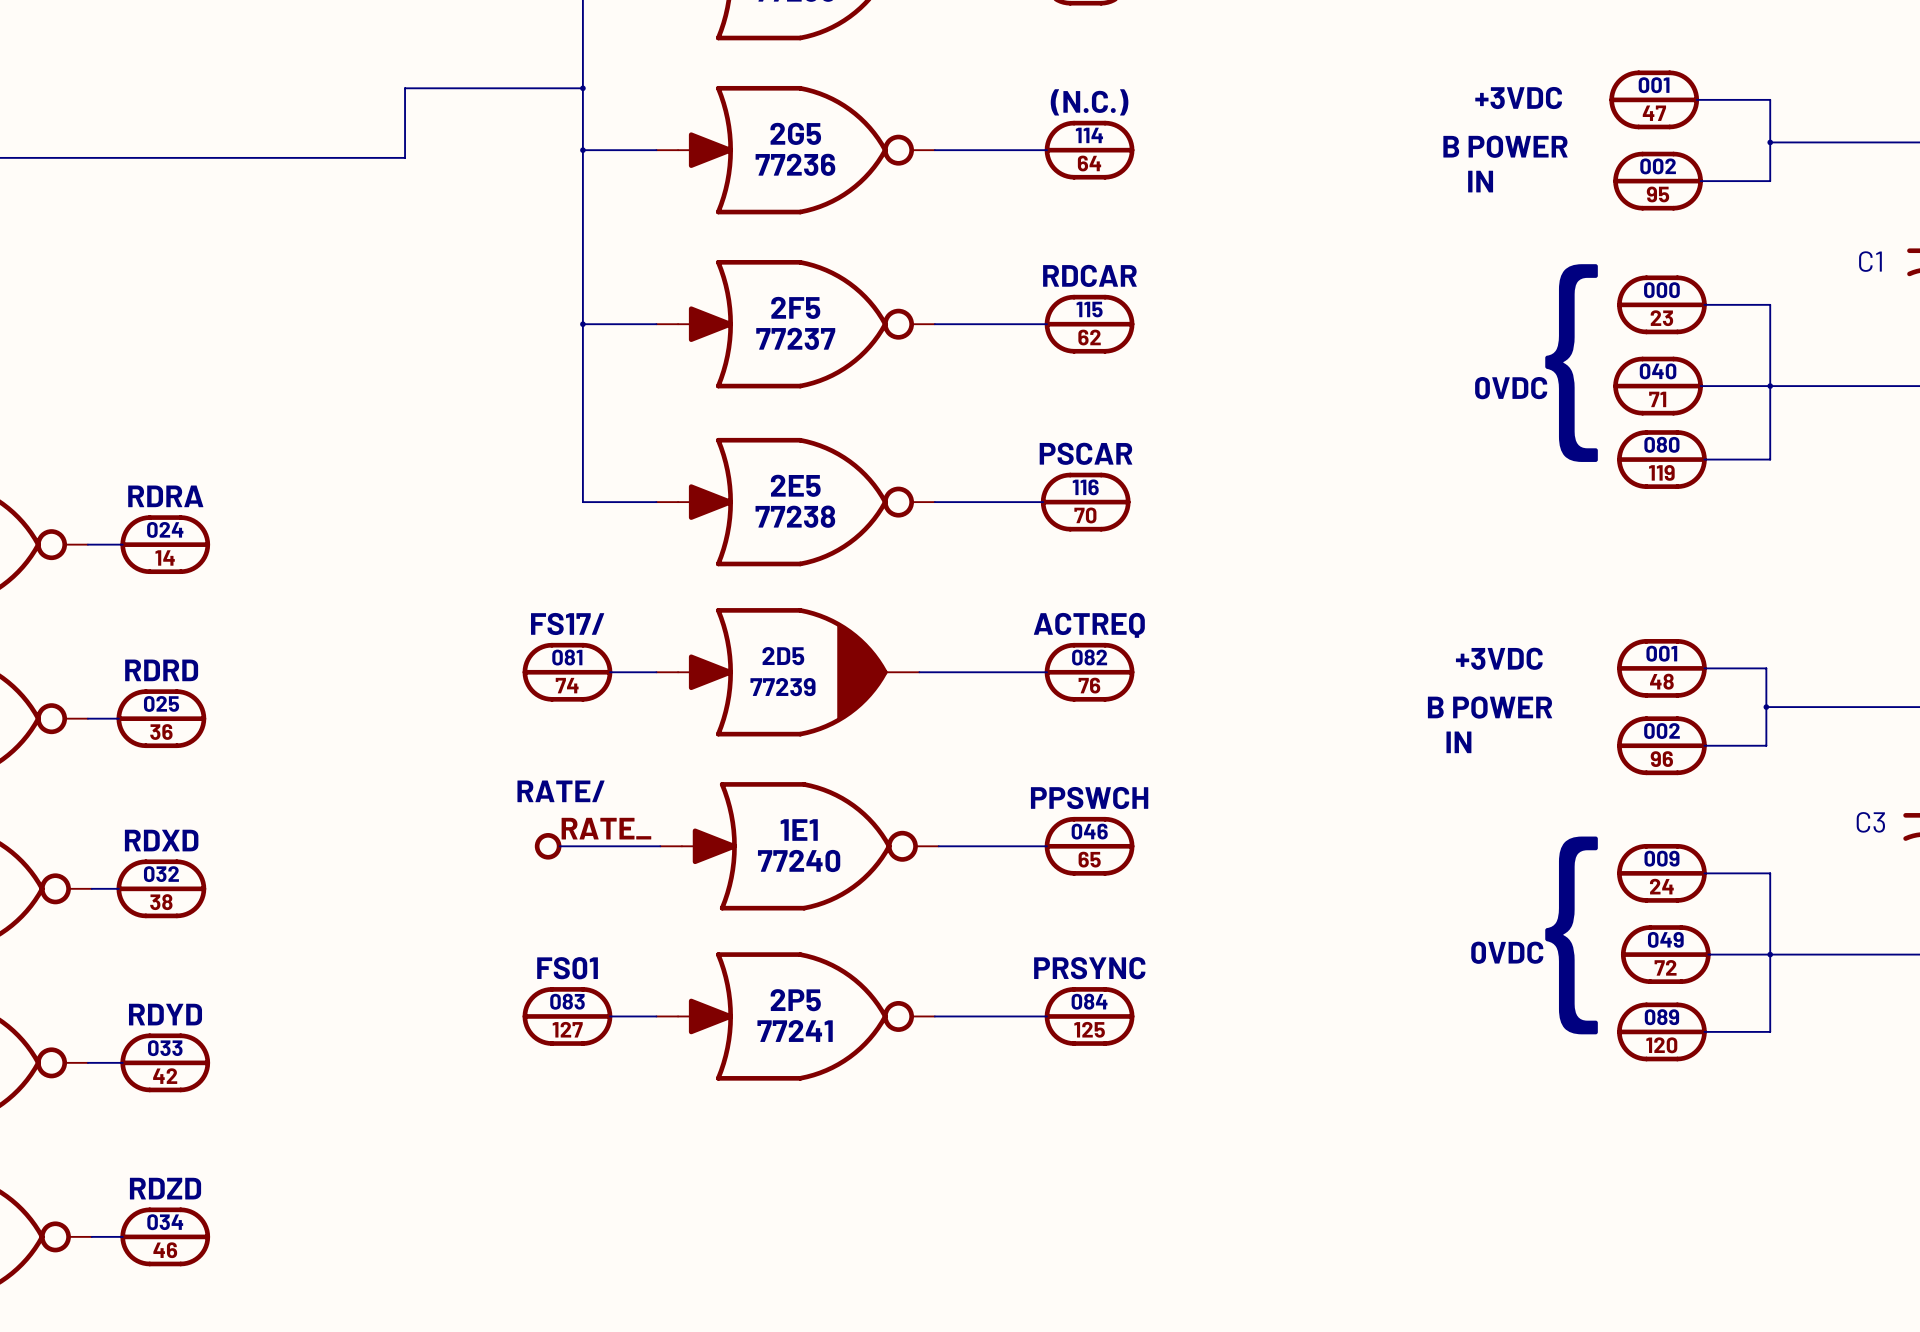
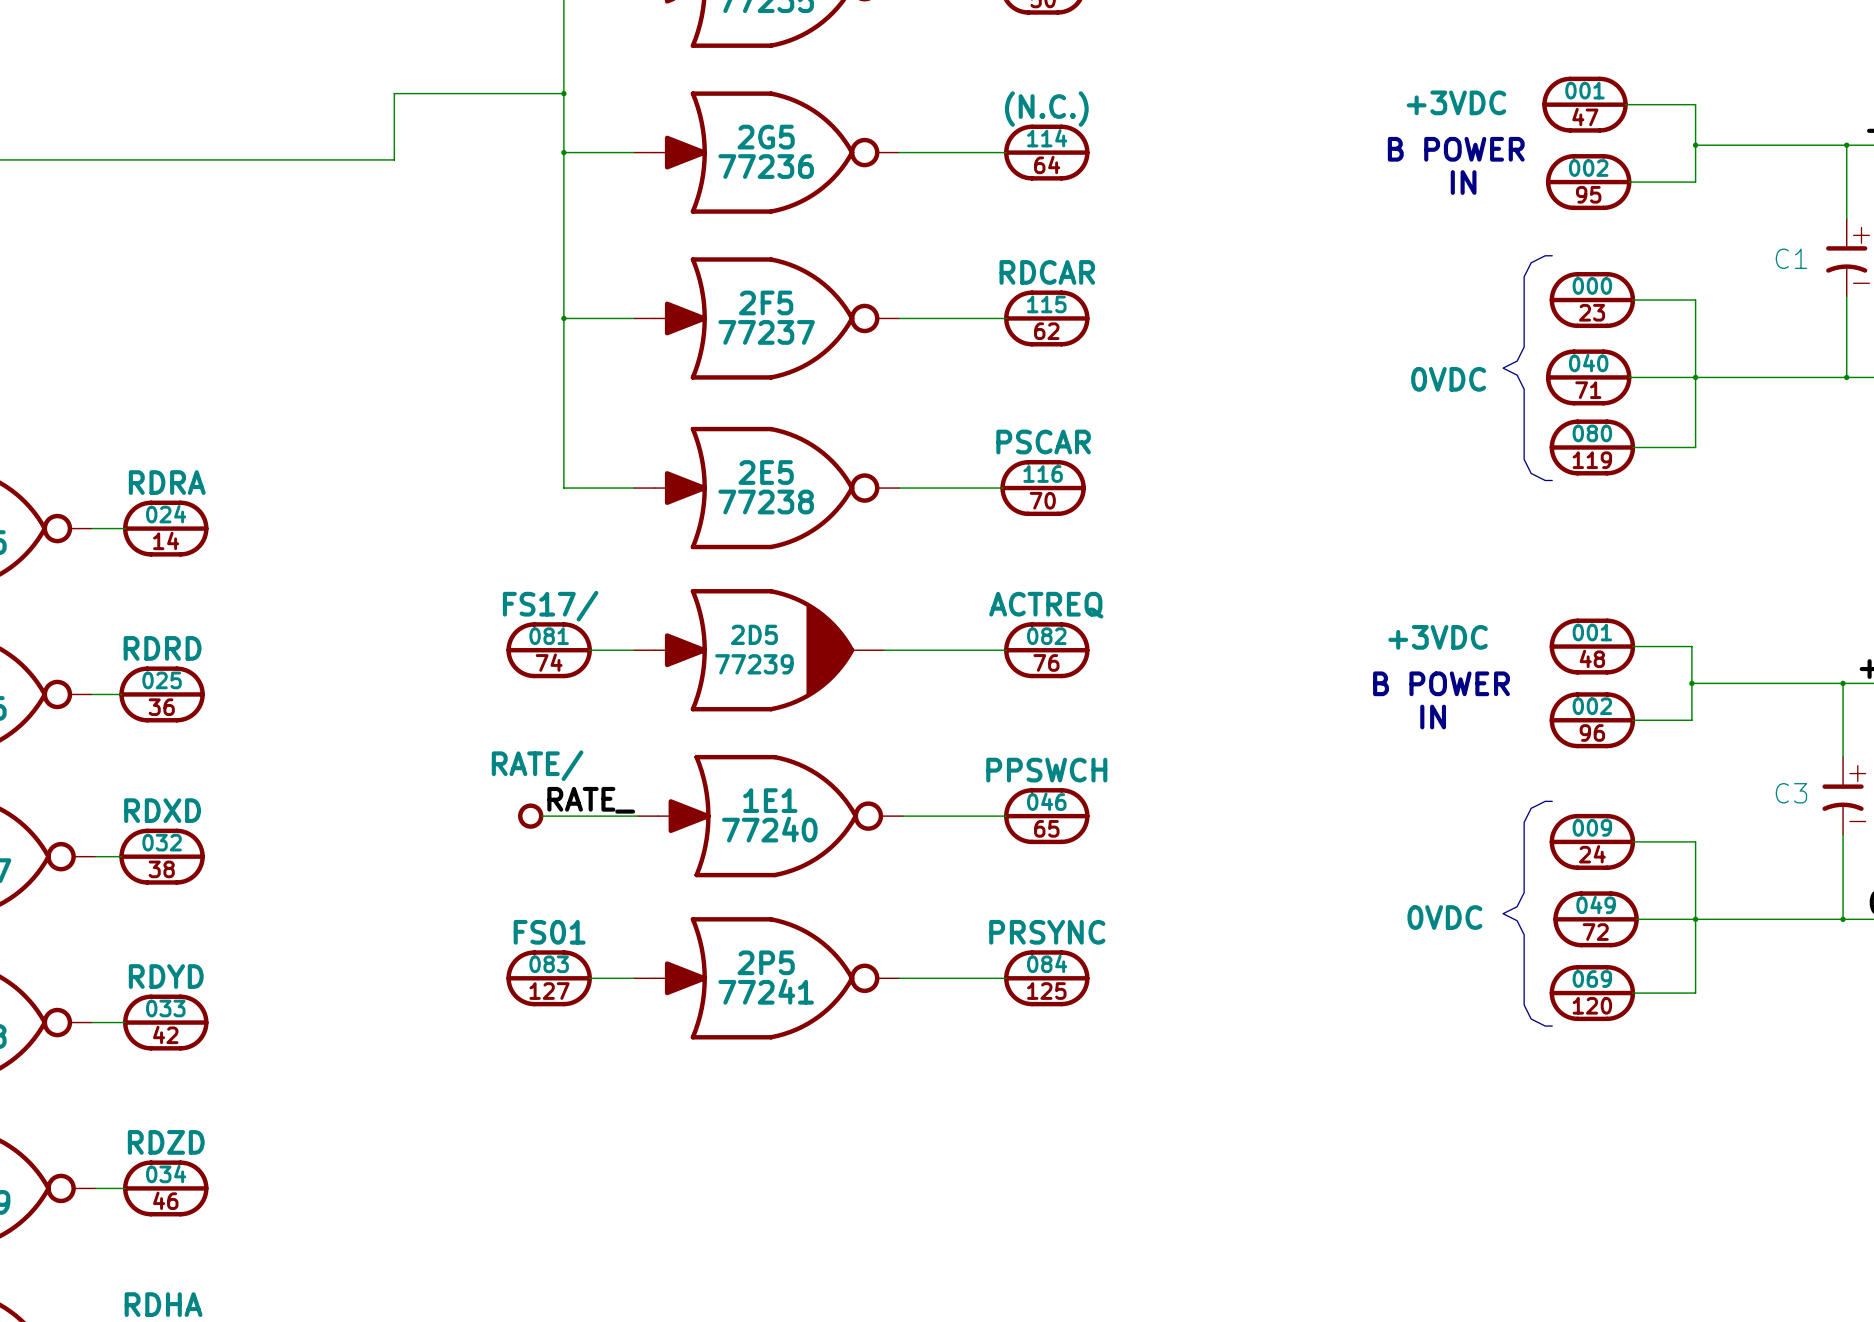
part text: 089 (1661, 1017) -> 069 (1592, 979)

